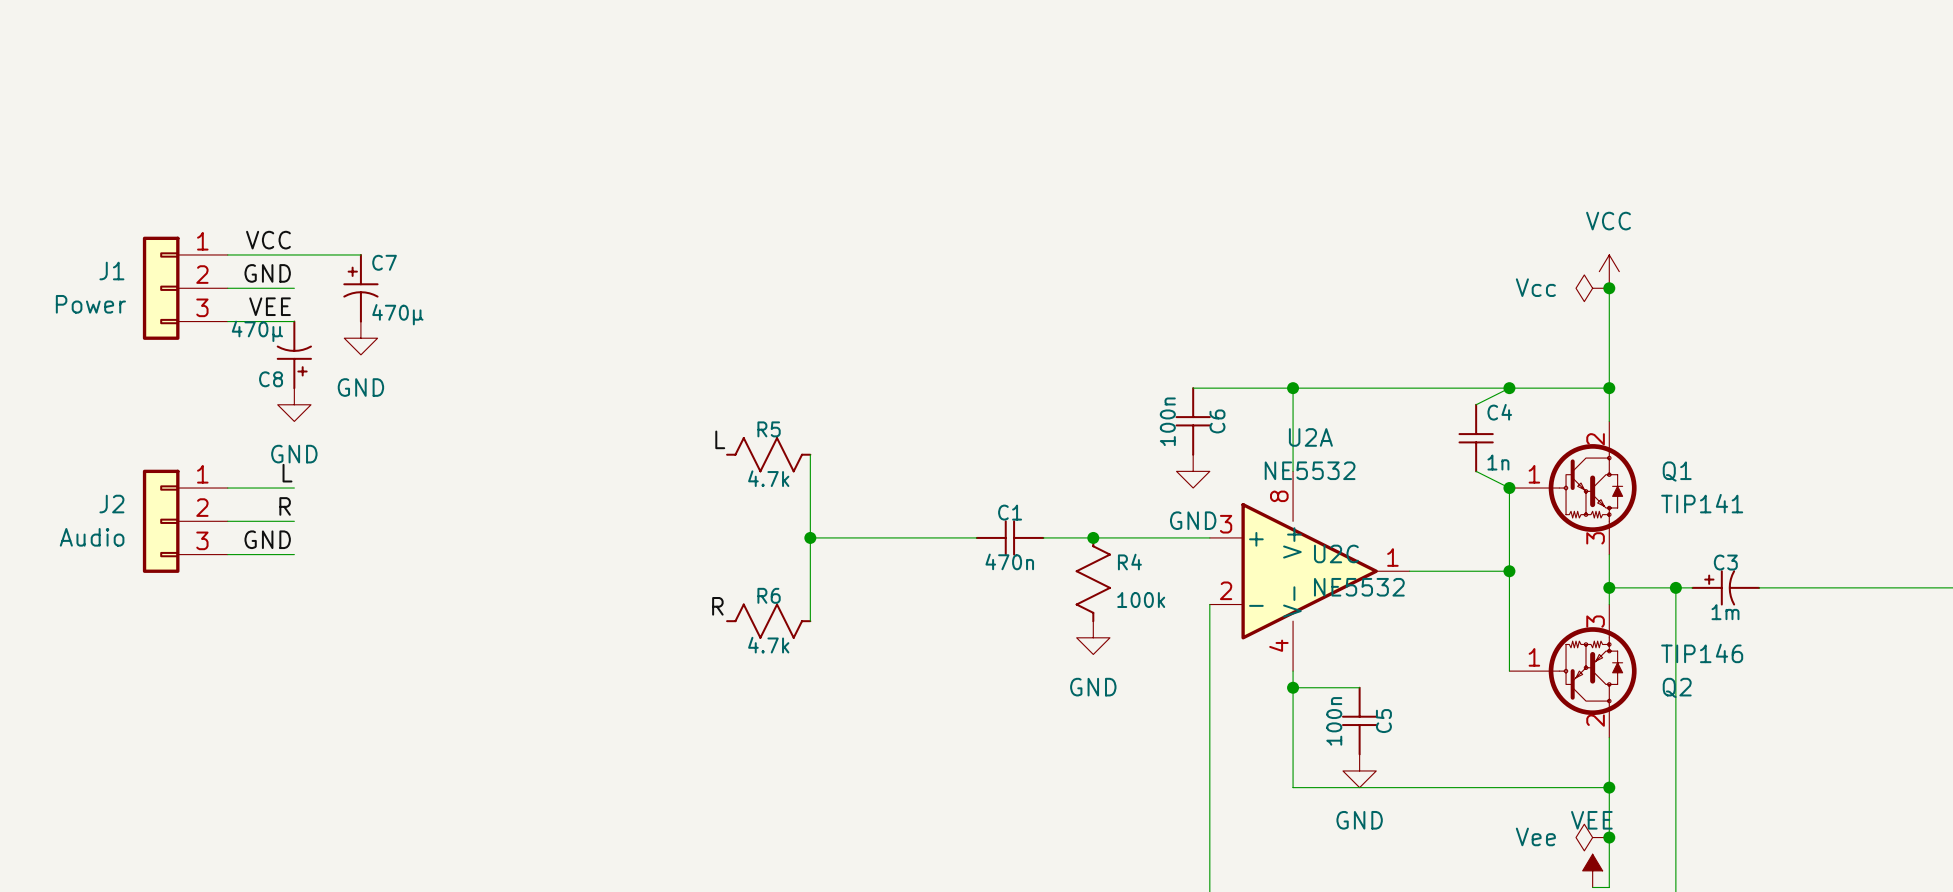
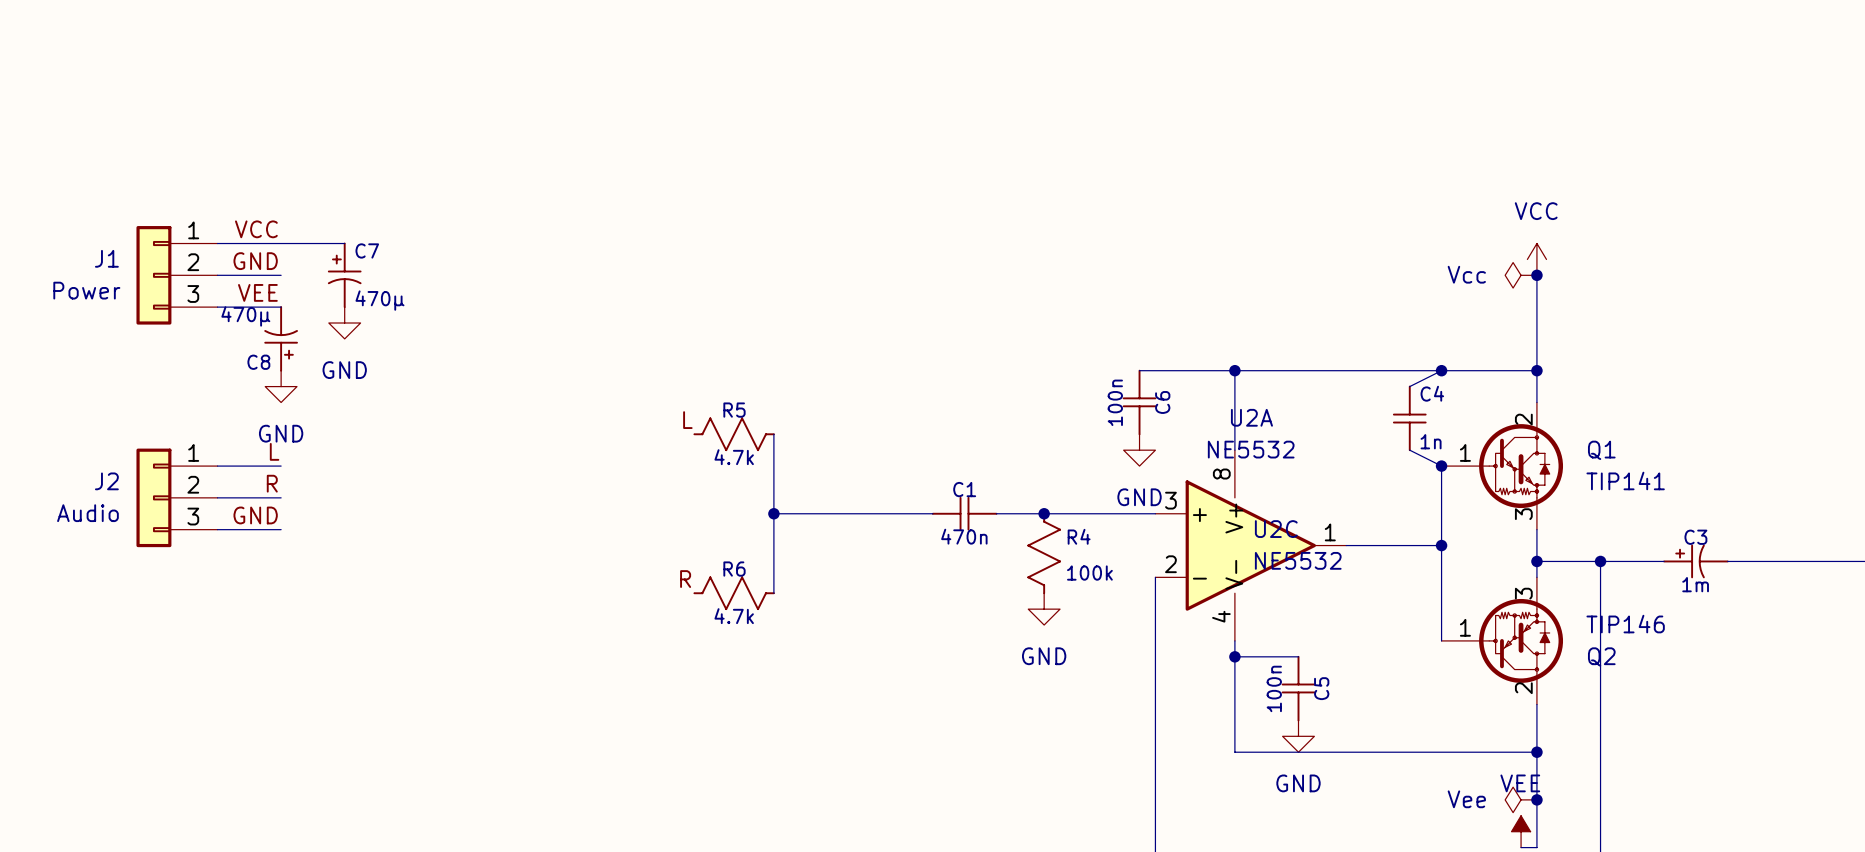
C3 position: (1725, 587) -> (1695, 561)

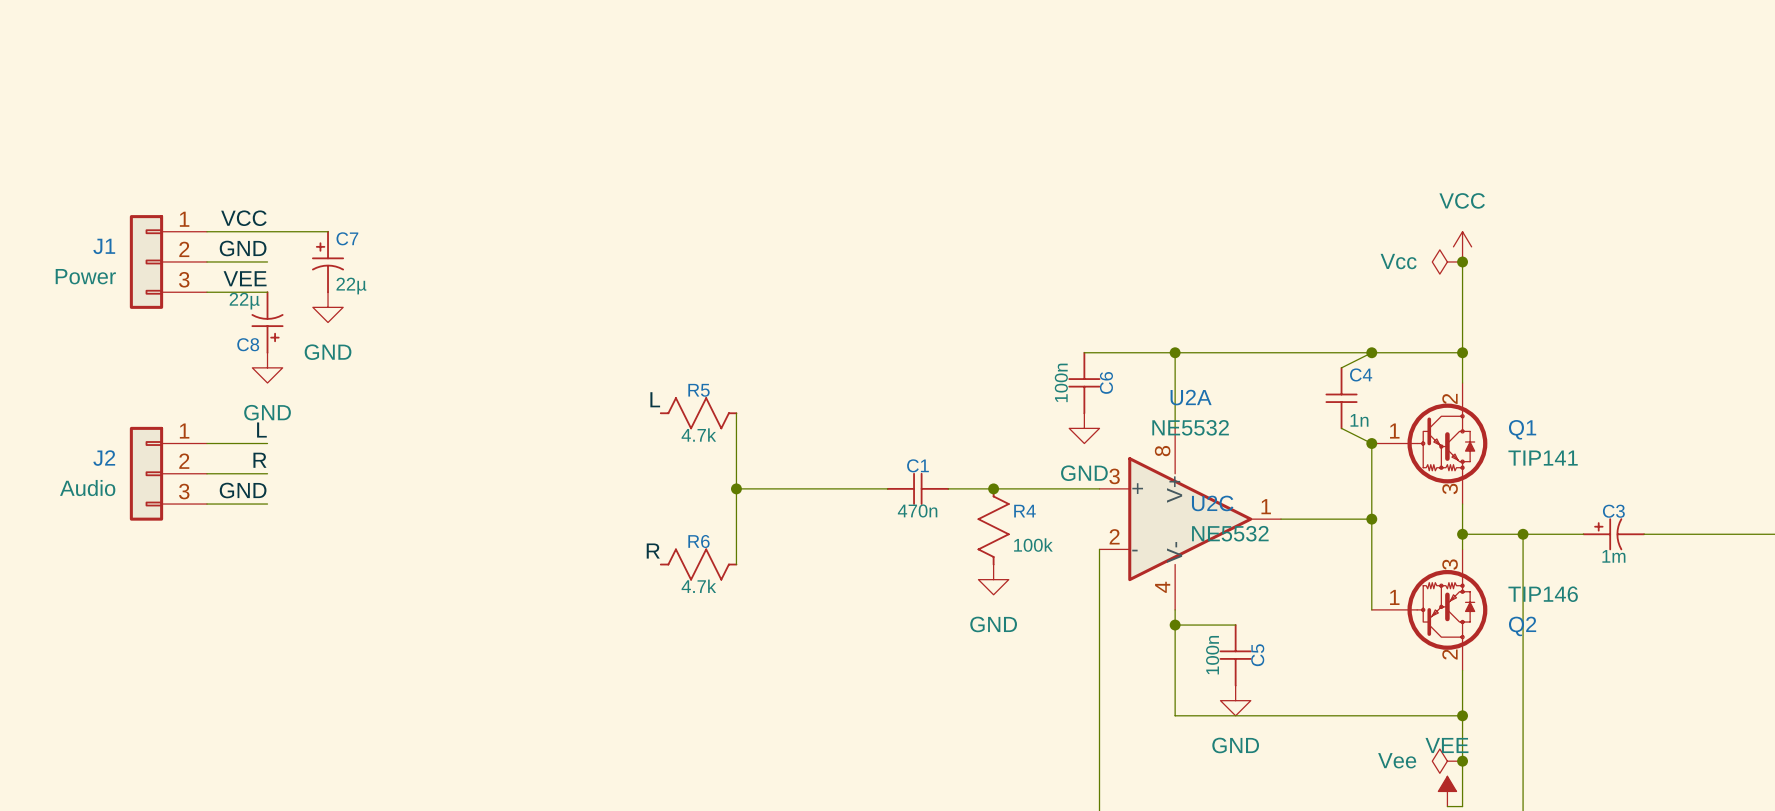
C7 value: 470µ (379, 300) -> 22µ (351, 286)
C8 value: 470µ (245, 316) -> 22µ (244, 301)

